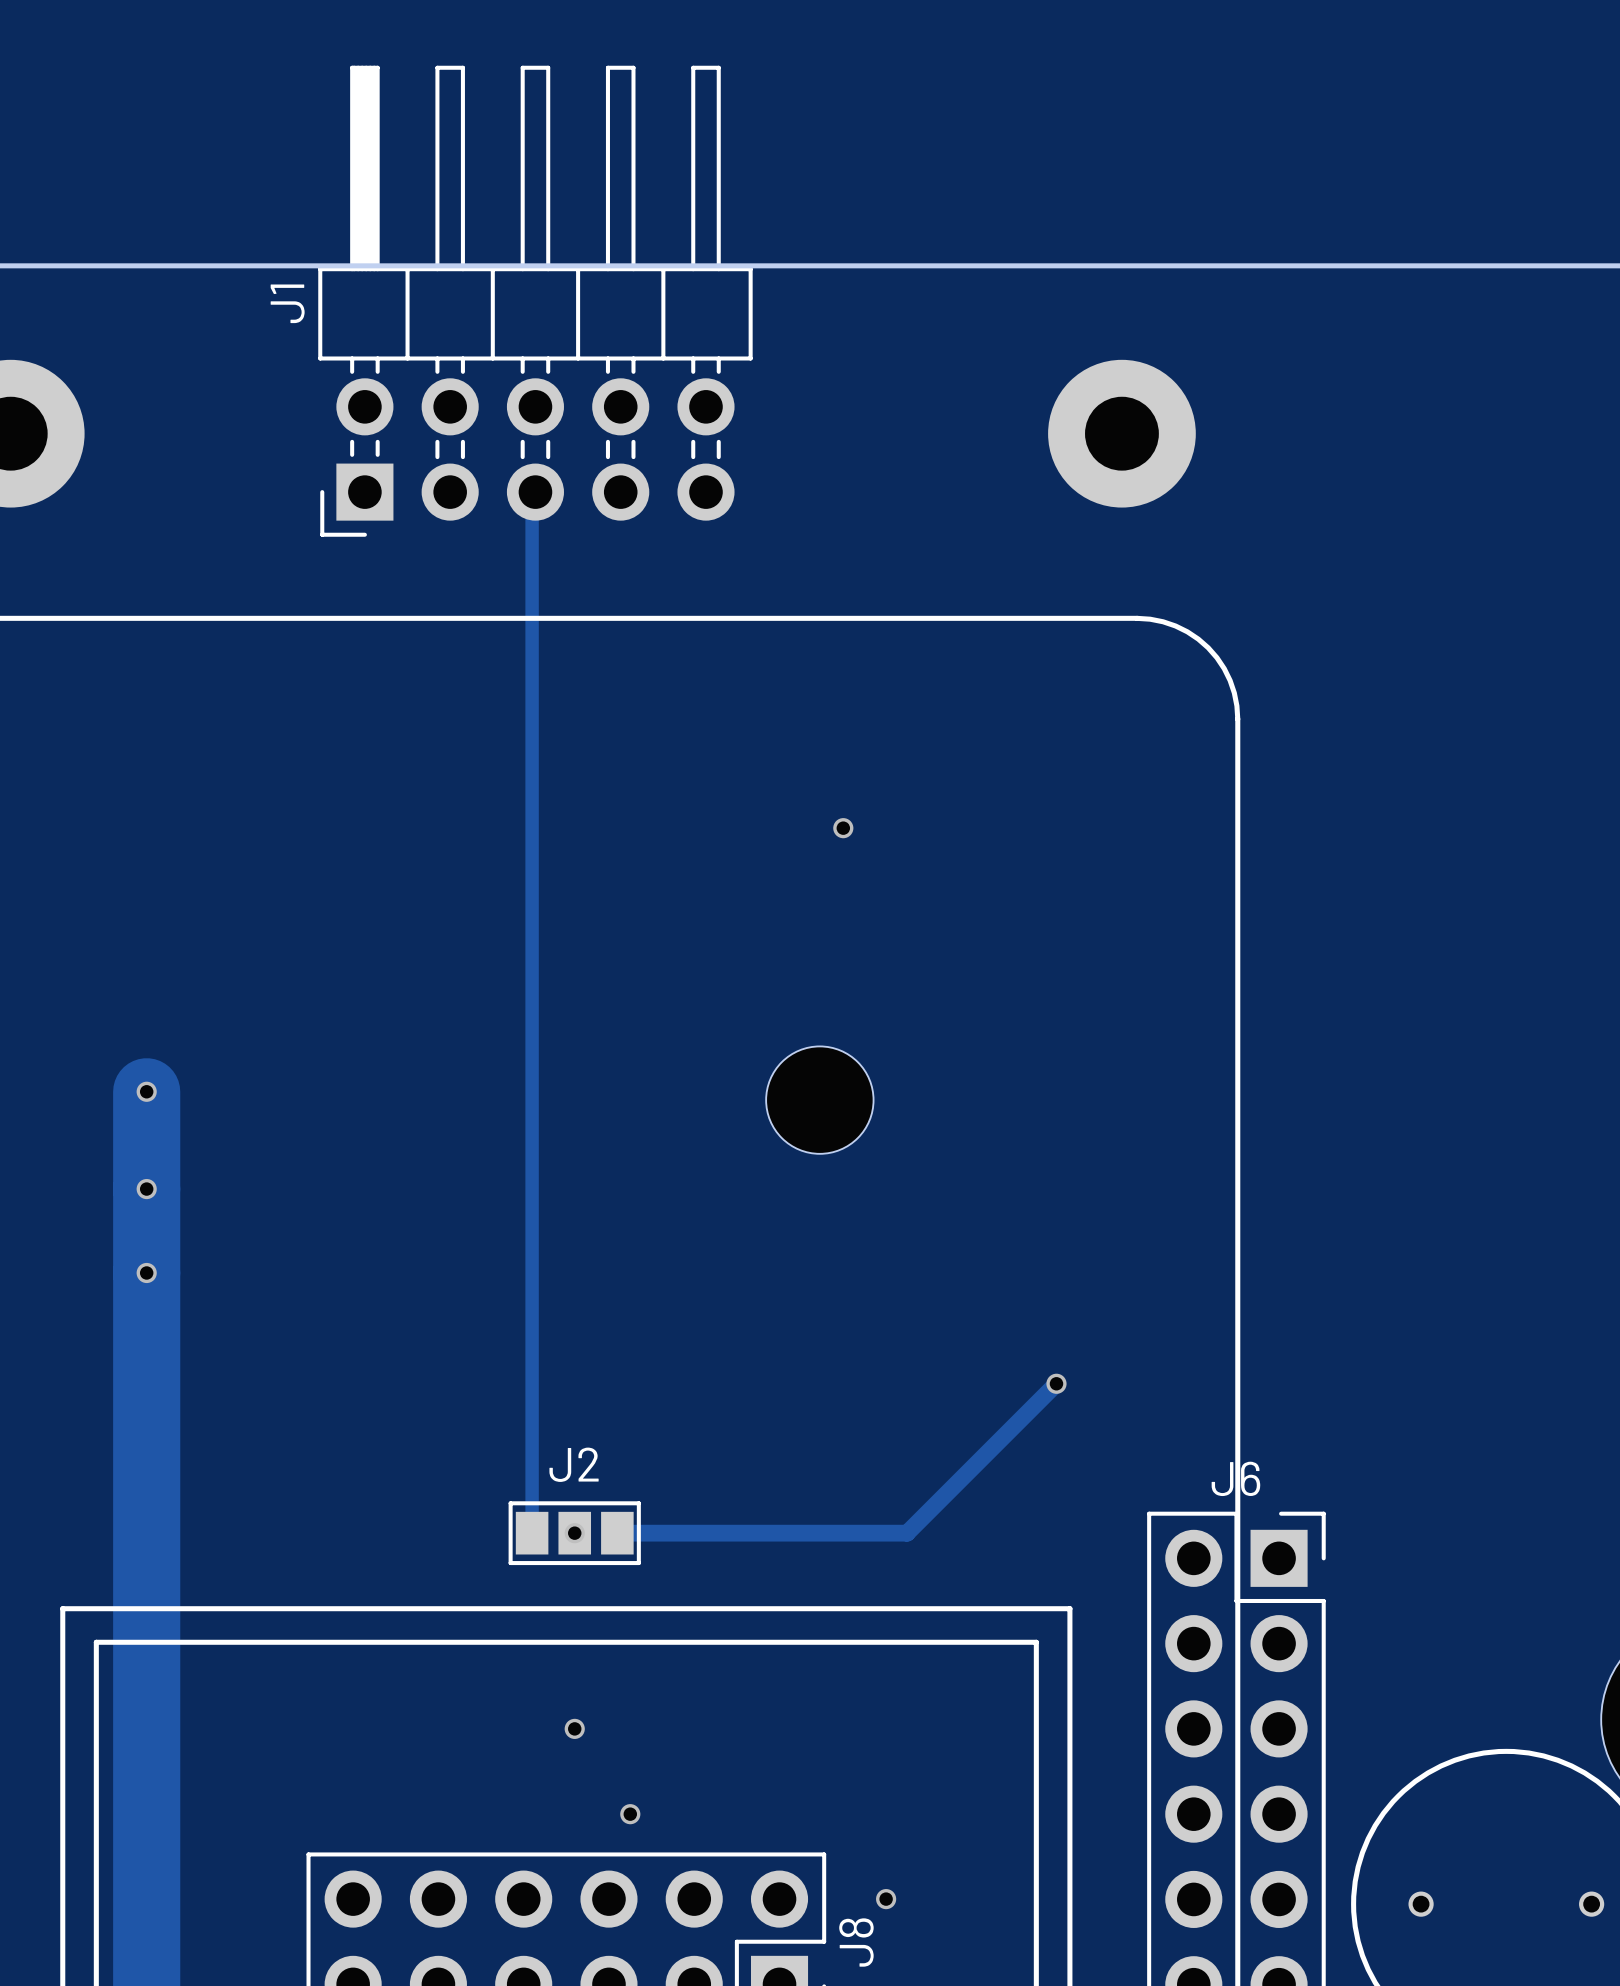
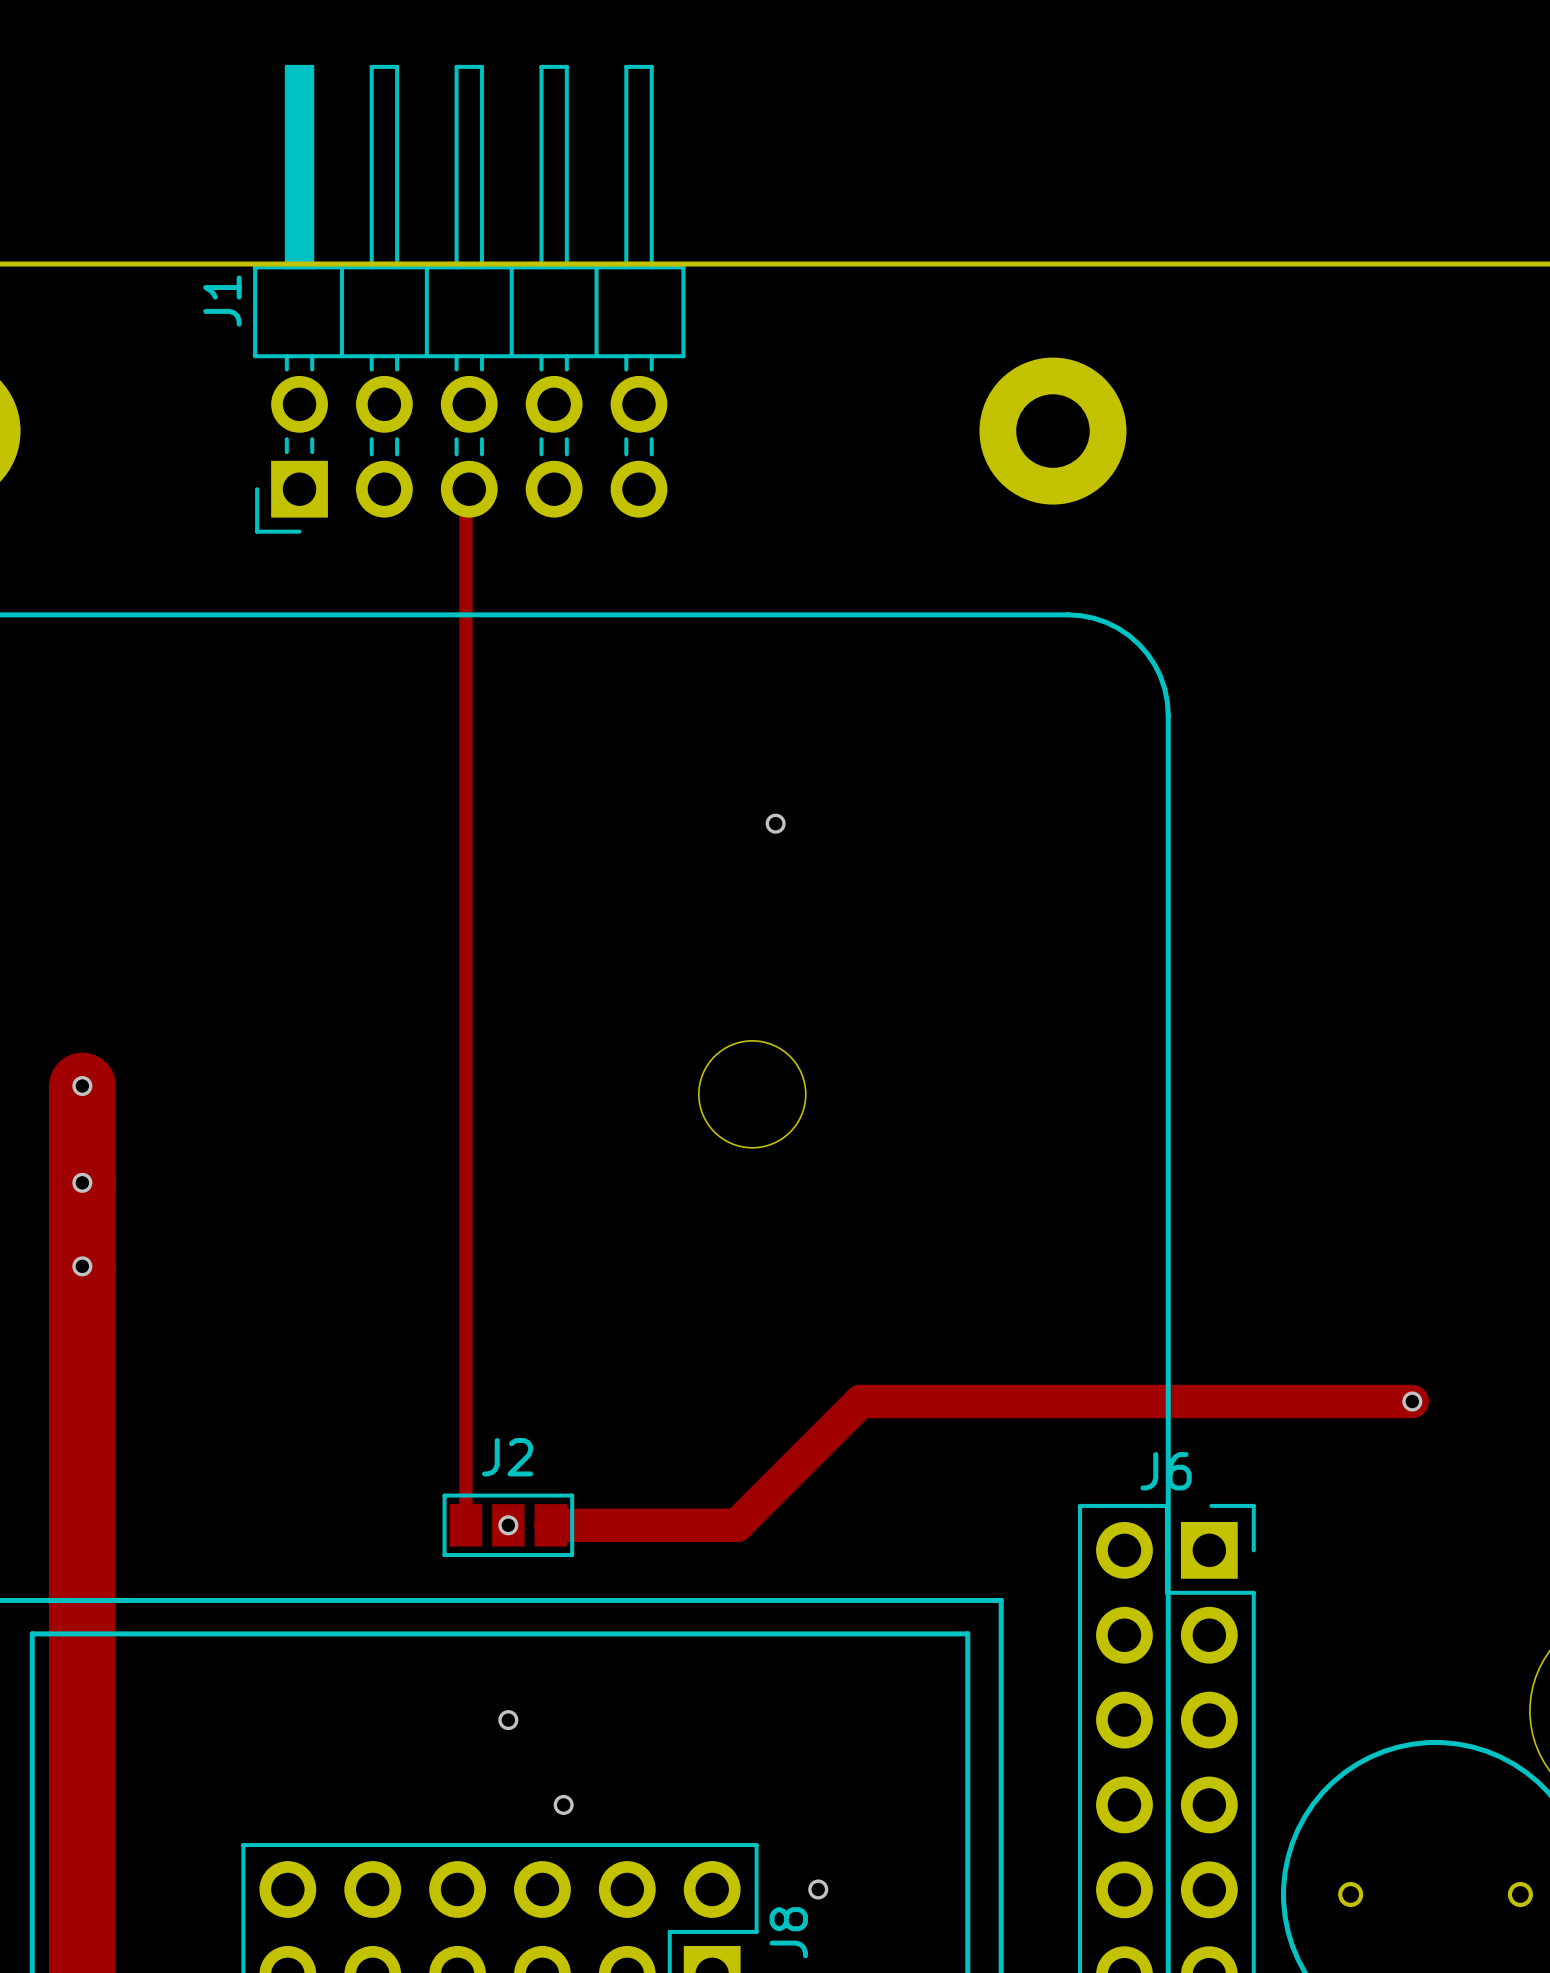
track: (1056, 1383) (907, 1533) (804, 1533) -> (1412, 1401) (860, 1401) (736, 1525)
via: (1056, 1383) -> none
via: none -> (1412, 1401)
track width: thin (617, 1533) (804, 1533) -> thick (550, 1525) (736, 1525)

